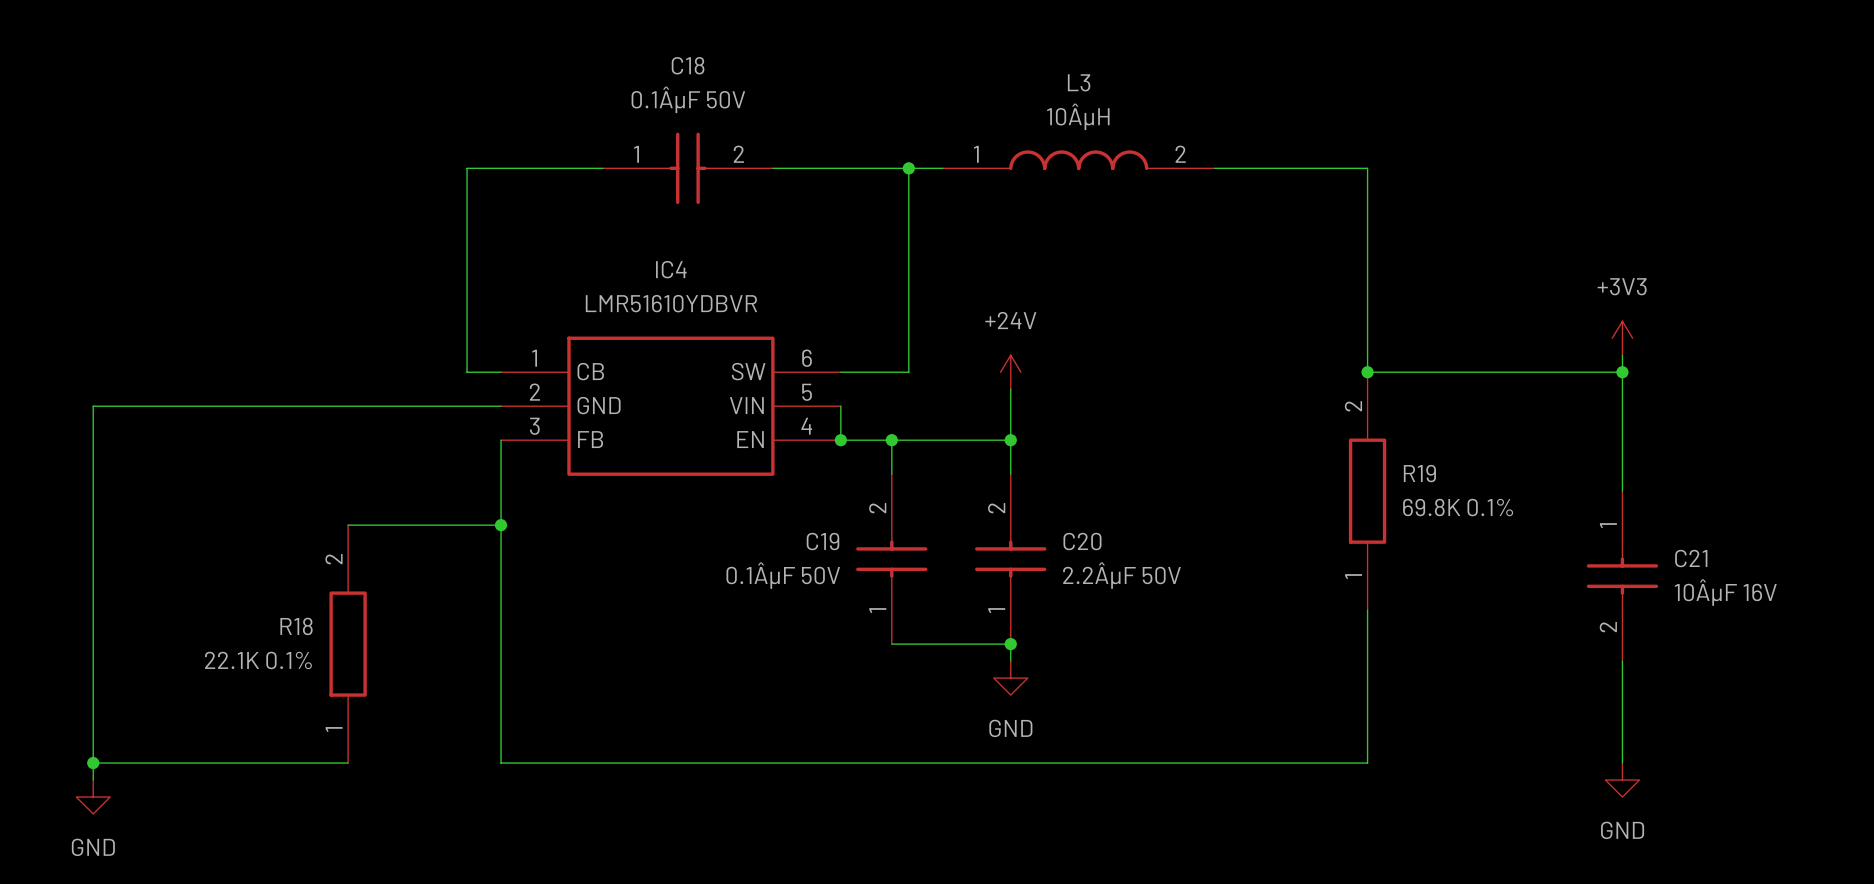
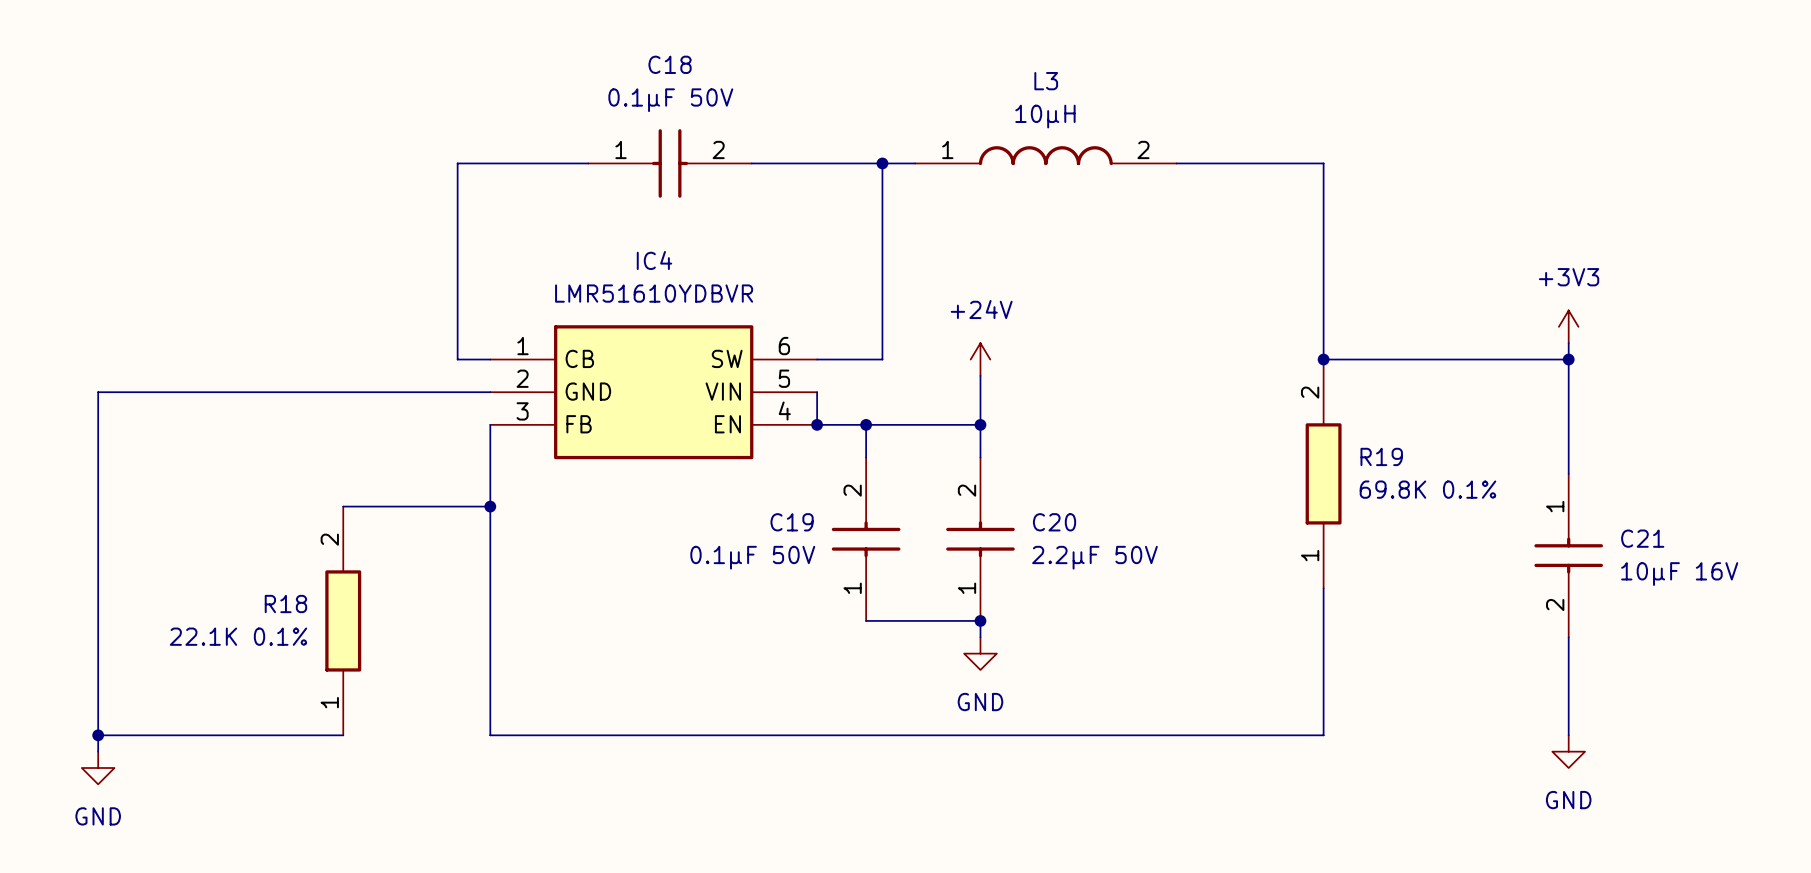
C18 value: 0.1ÂµF 50V (688, 99) -> 0.1µF 50V (670, 100)
L3 value: 10ÂµH (1078, 116) -> 10µH (1045, 116)
C19 value: 0.1ÂµF 50V (783, 575) -> 0.1µF 50V (752, 557)
C20 value: 2.2ÂµF 50V (1121, 575) -> 2.2µF 50V (1094, 557)
C21 value: 10ÂµF 16V (1725, 592) -> 10µF 16V (1679, 574)

